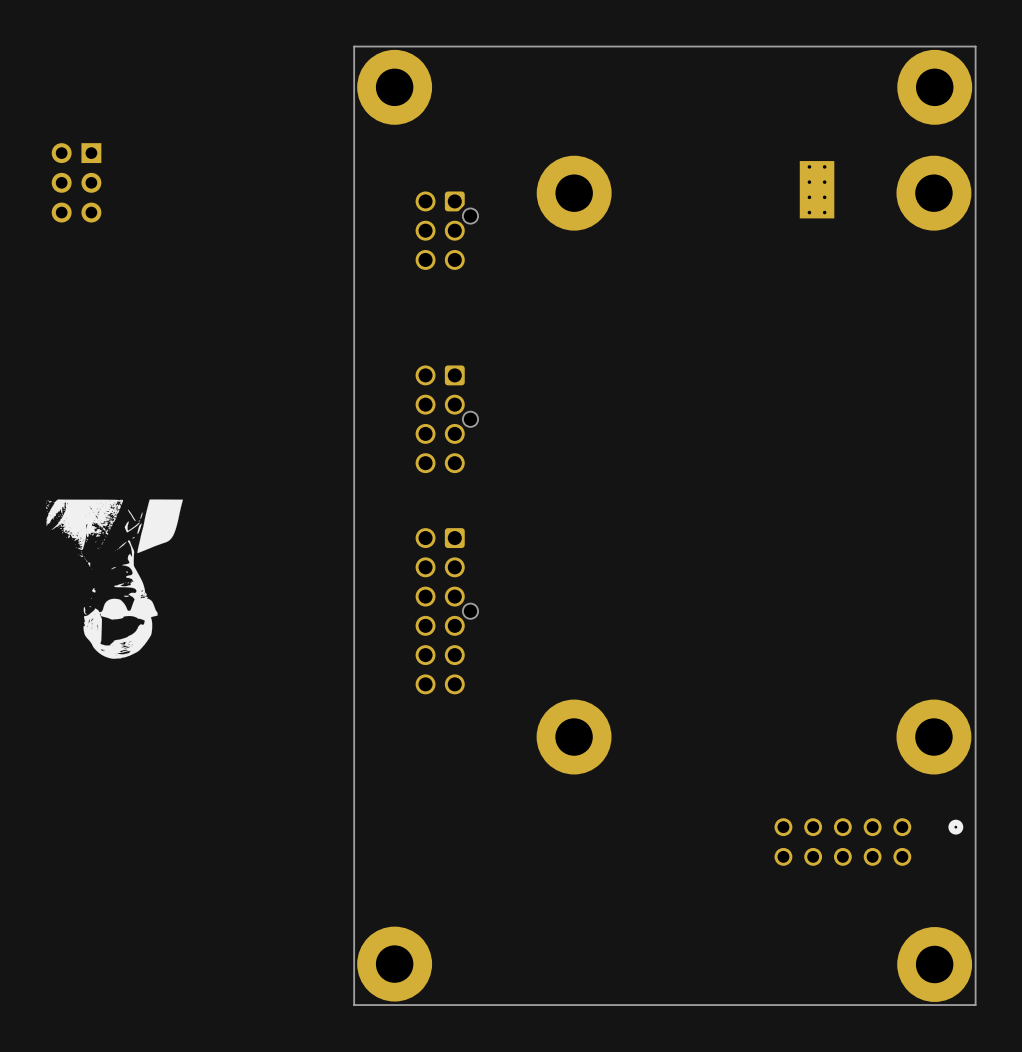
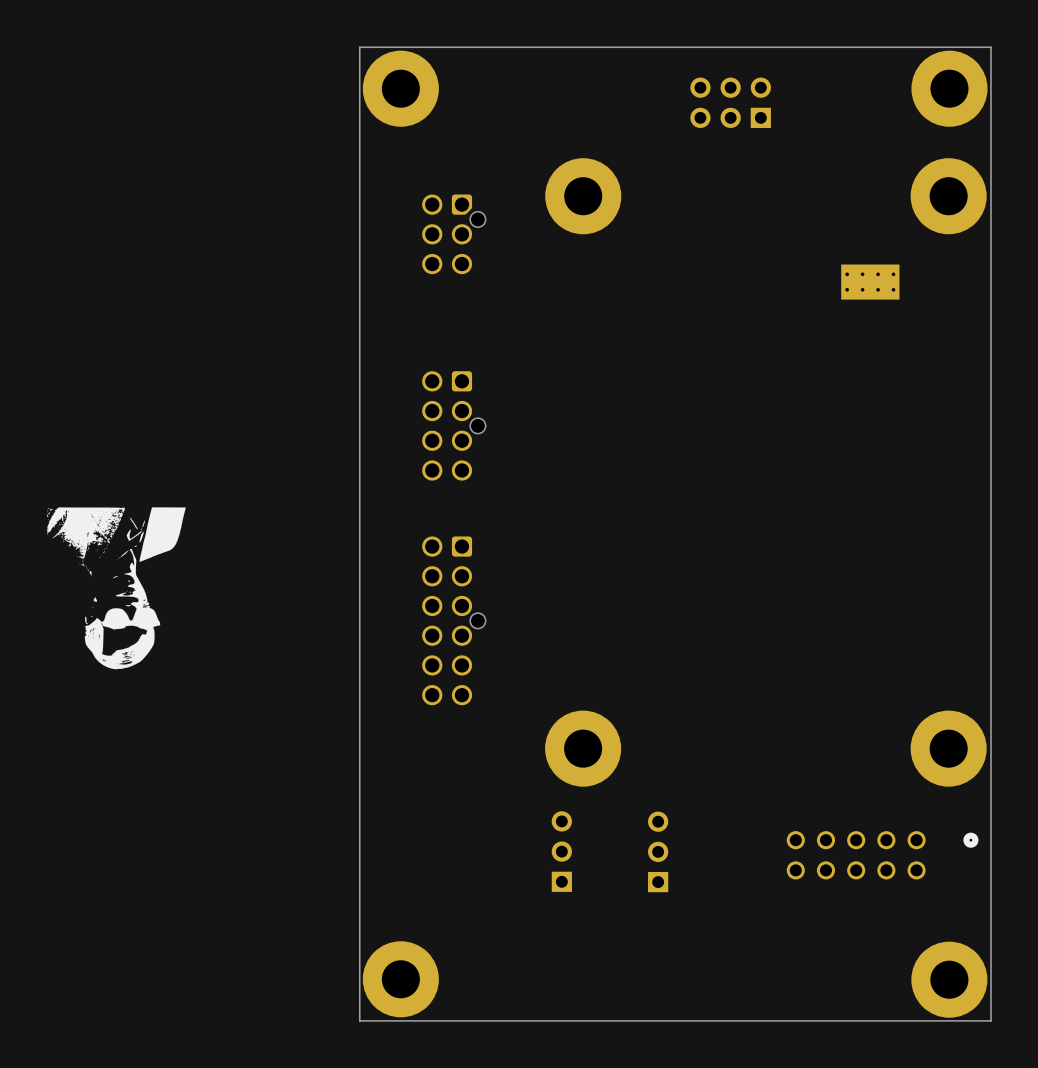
part: none -> (730, 102)
part: (76, 182) -> none
part rotation: 0° (817, 189) -> 90° clockwise (870, 282)
part position: (817, 189) -> (870, 282)
part: none -> (561, 851)
part: none -> (658, 851)

